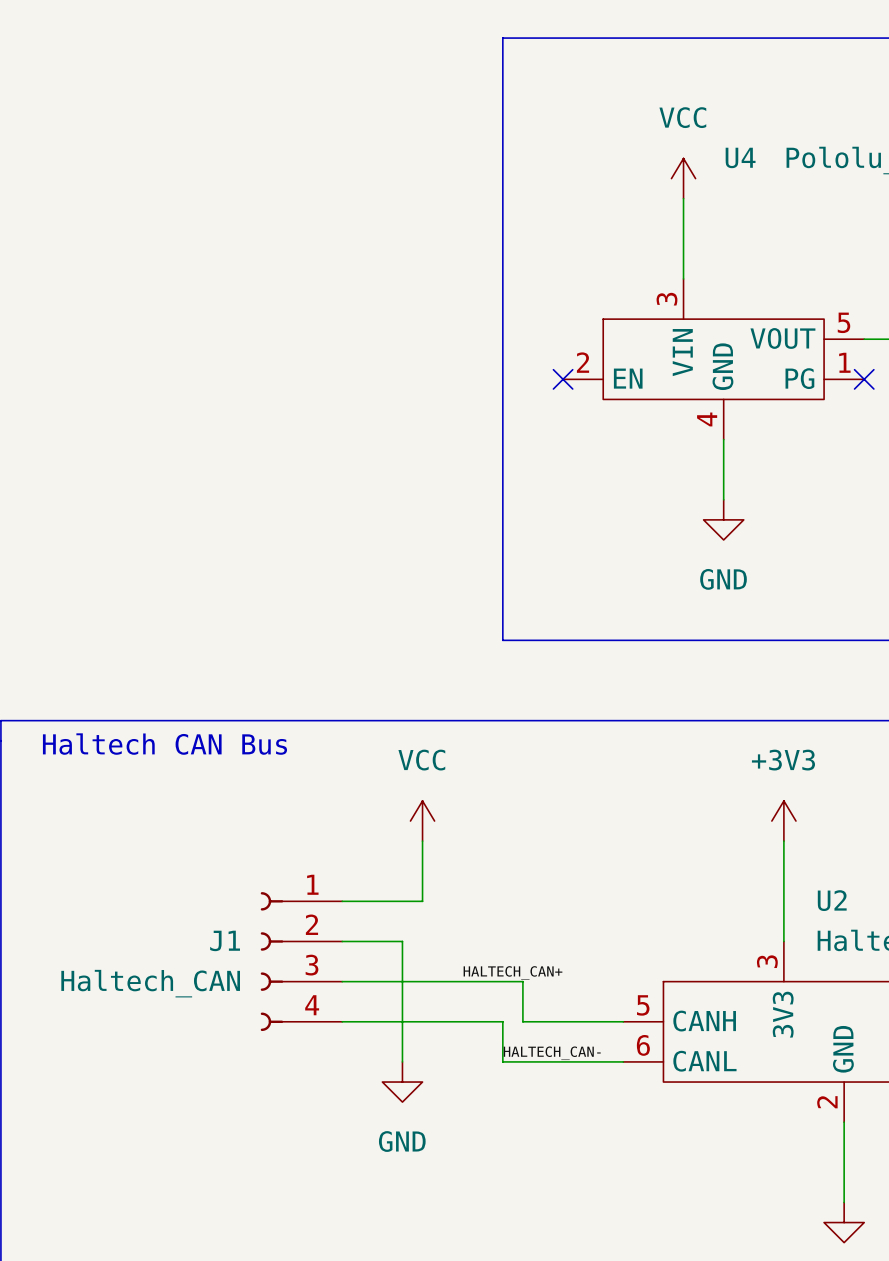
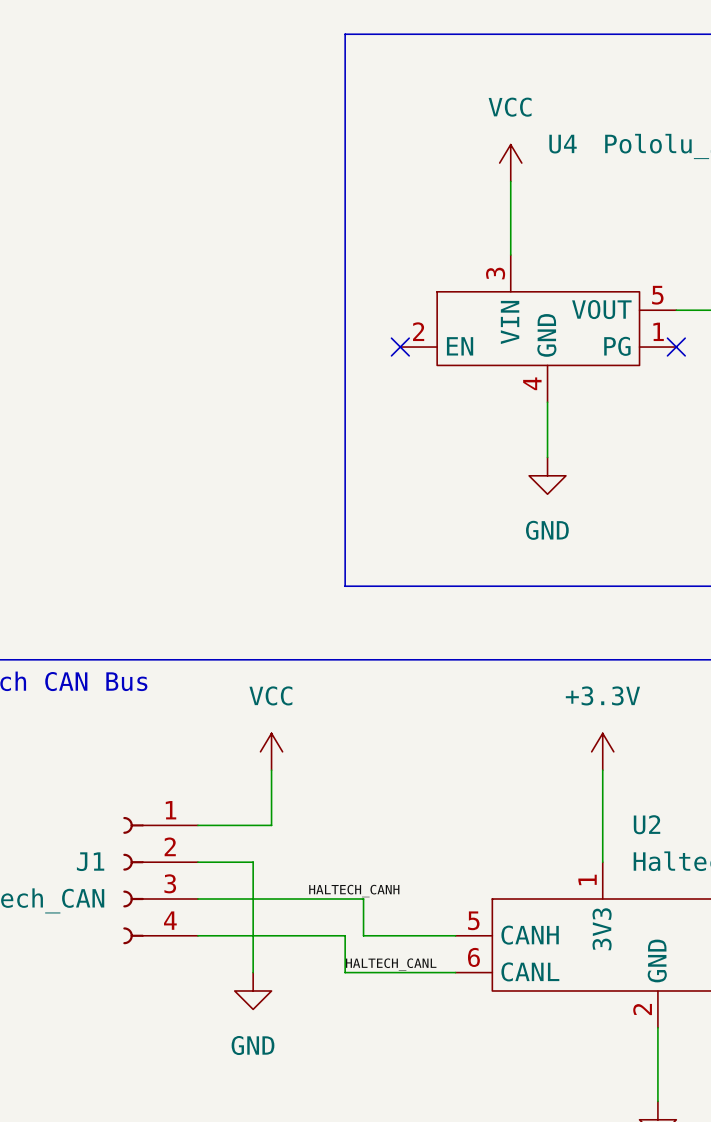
power symbol: +3V3 (783, 821) -> +3.3V (602, 751)
U2 pin number: 3 (767, 961) -> 1 (587, 879)
label: HALTECH_CAN+ (512, 972) -> HALTECH_CANH (354, 891)
label: HALTECH_CAN- (552, 1053) -> HALTECH_CANL (391, 964)

